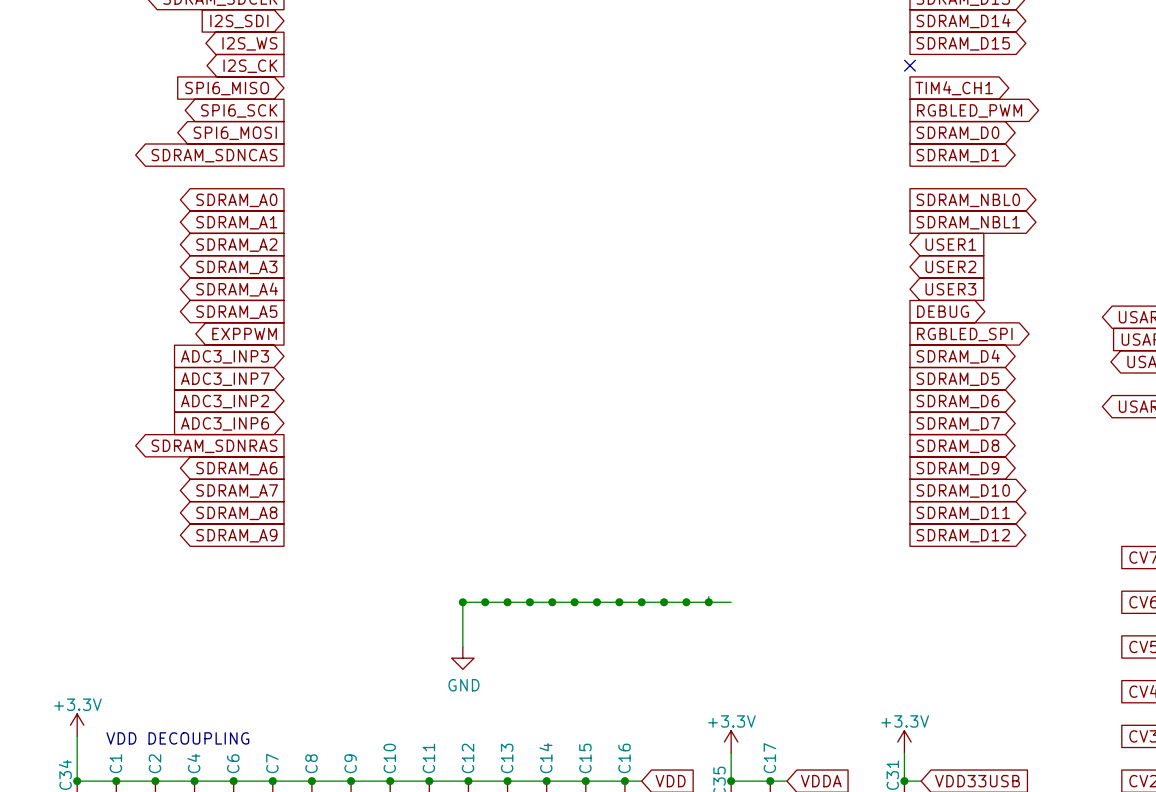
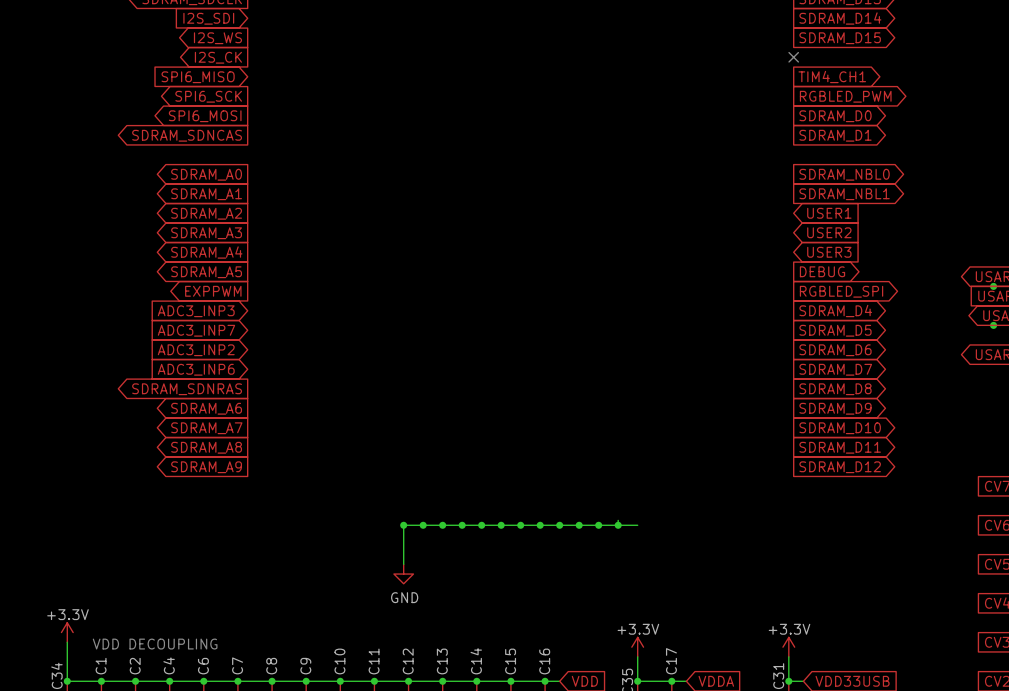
junction: none -> (993, 286)
junction: none -> (993, 325)

